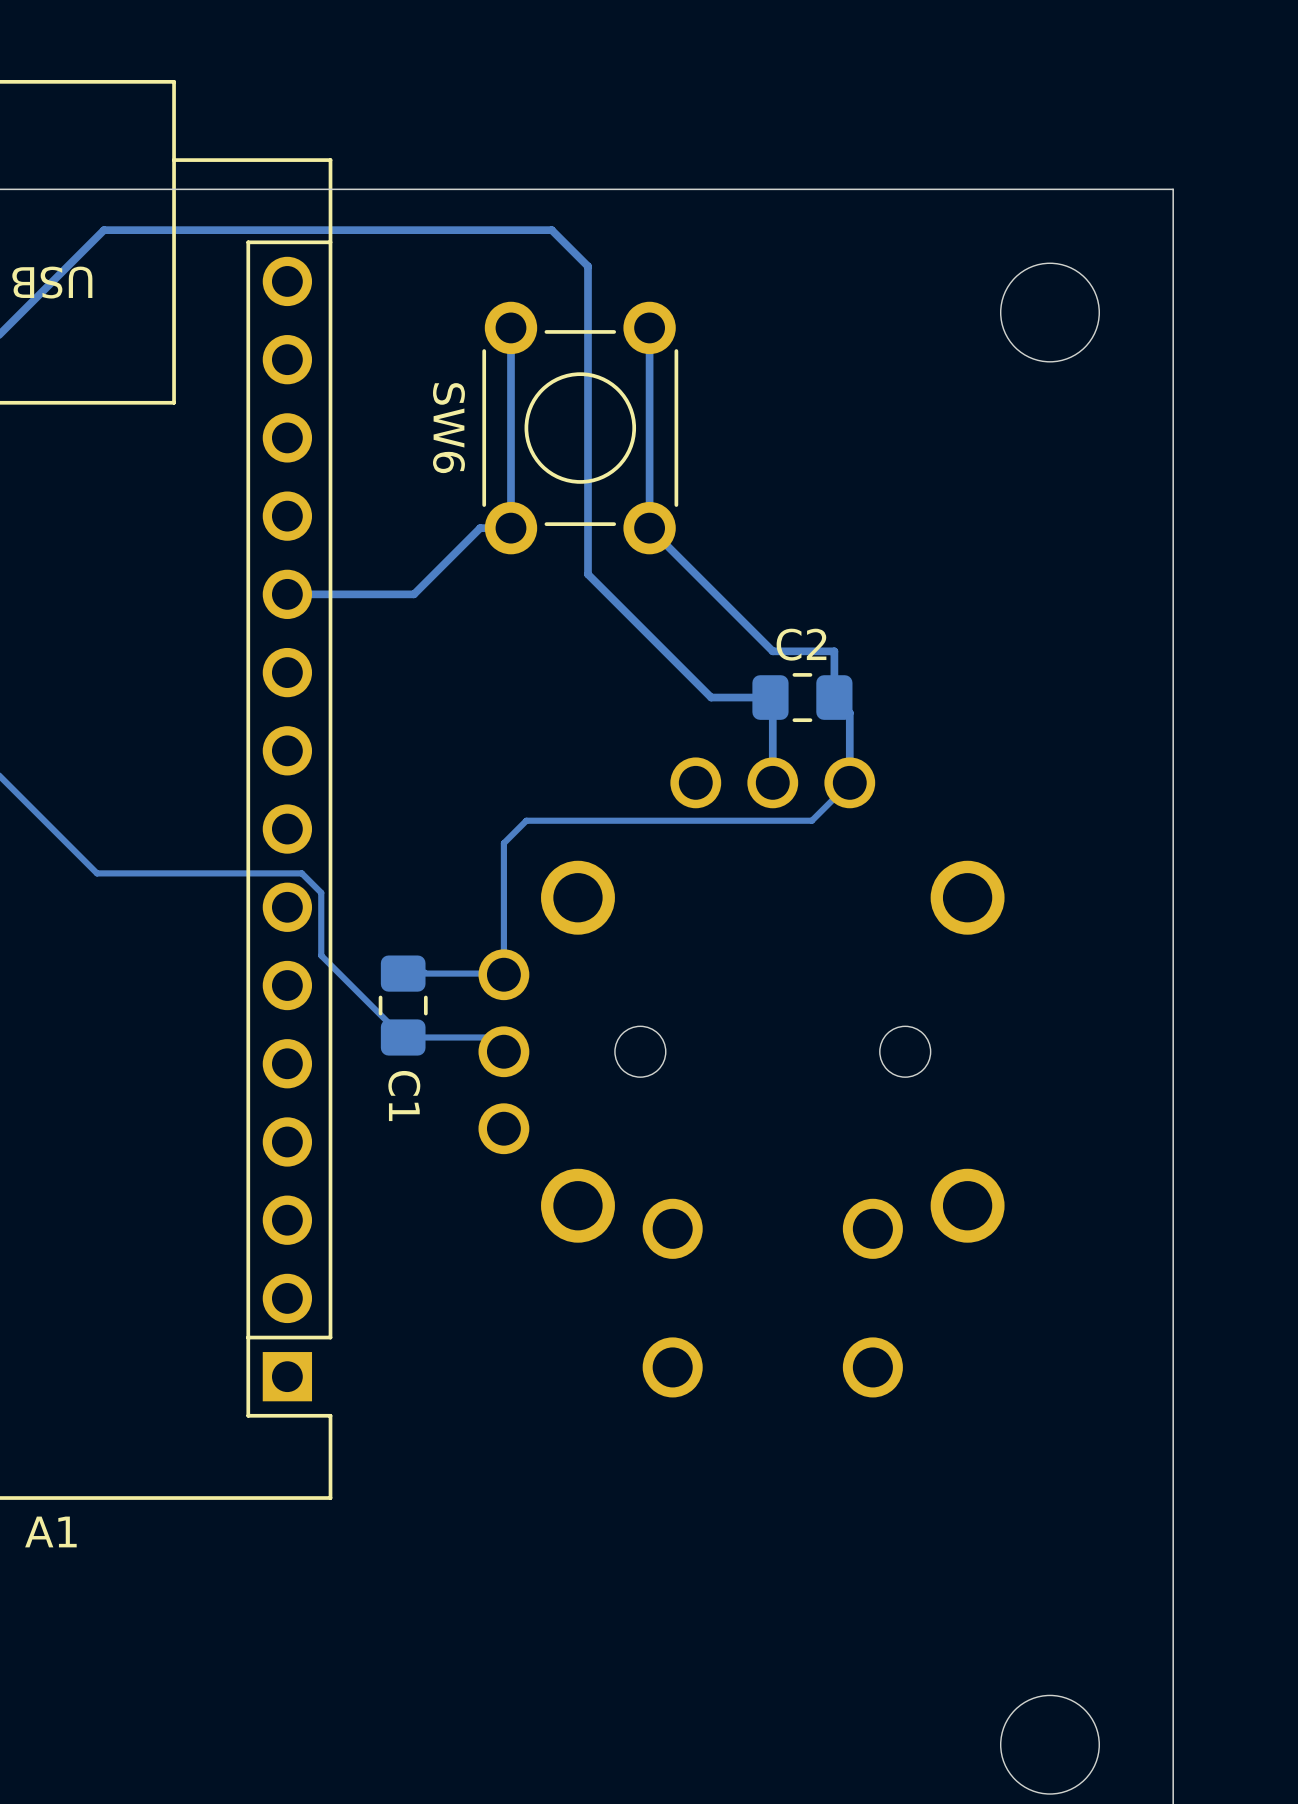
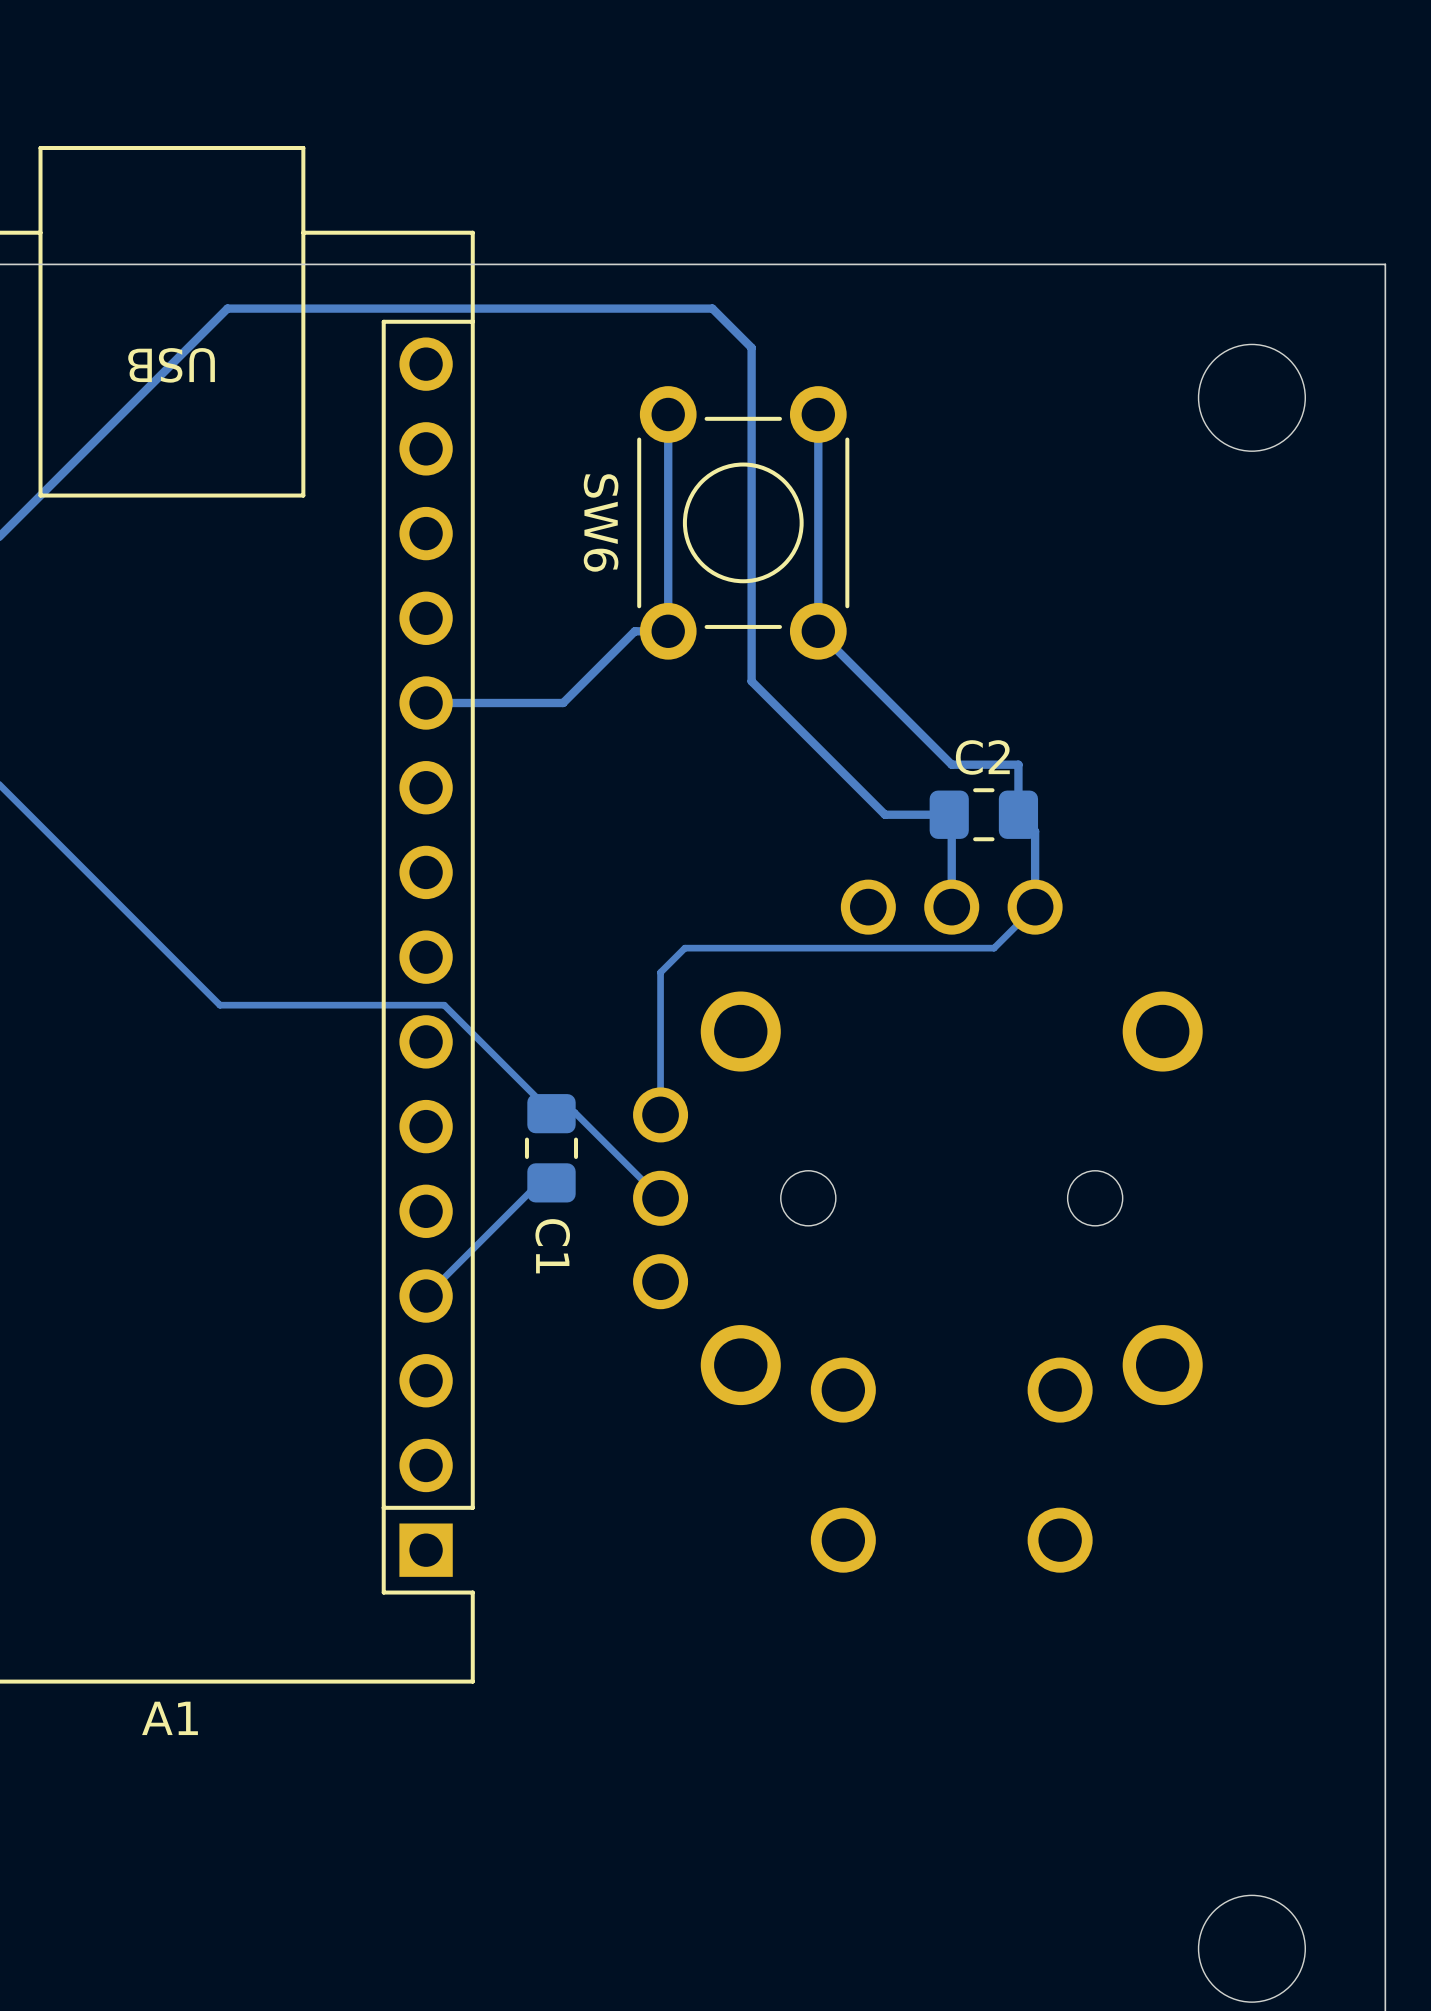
track: (301, 873) (321, 892) (321, 955) (403, 1037) (489, 1037) -> (441, 1005) (444, 1005) (551, 1112)
track: none -> (574, 1112) (645, 1182)
track: (403, 973) (503, 974) -> none
track: none -> (540, 1181) (426, 1296)

